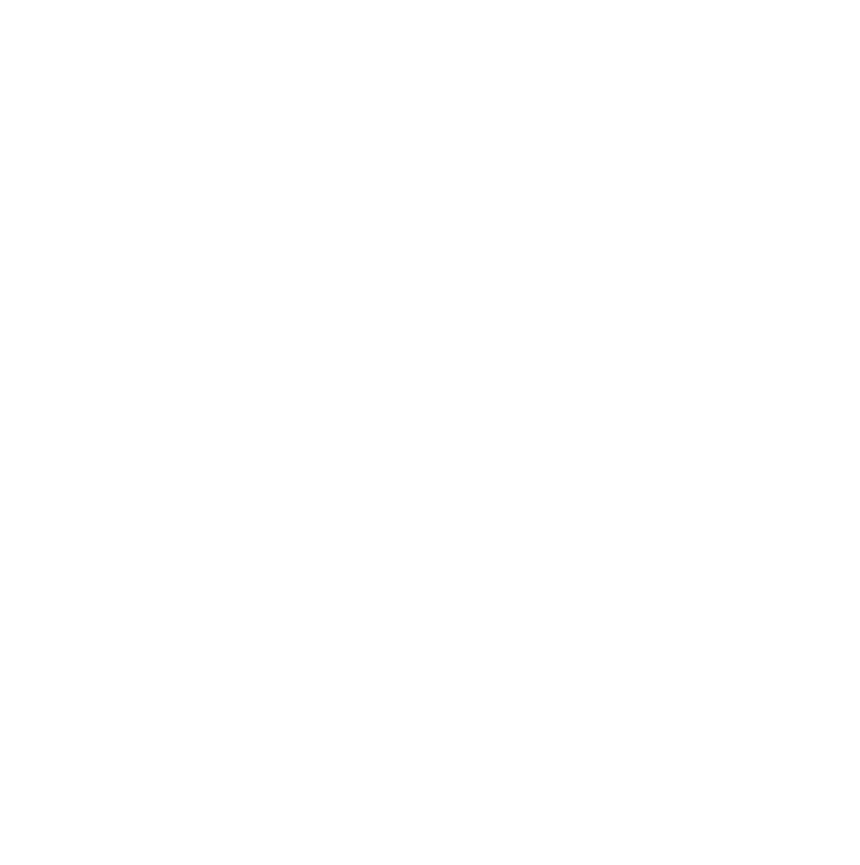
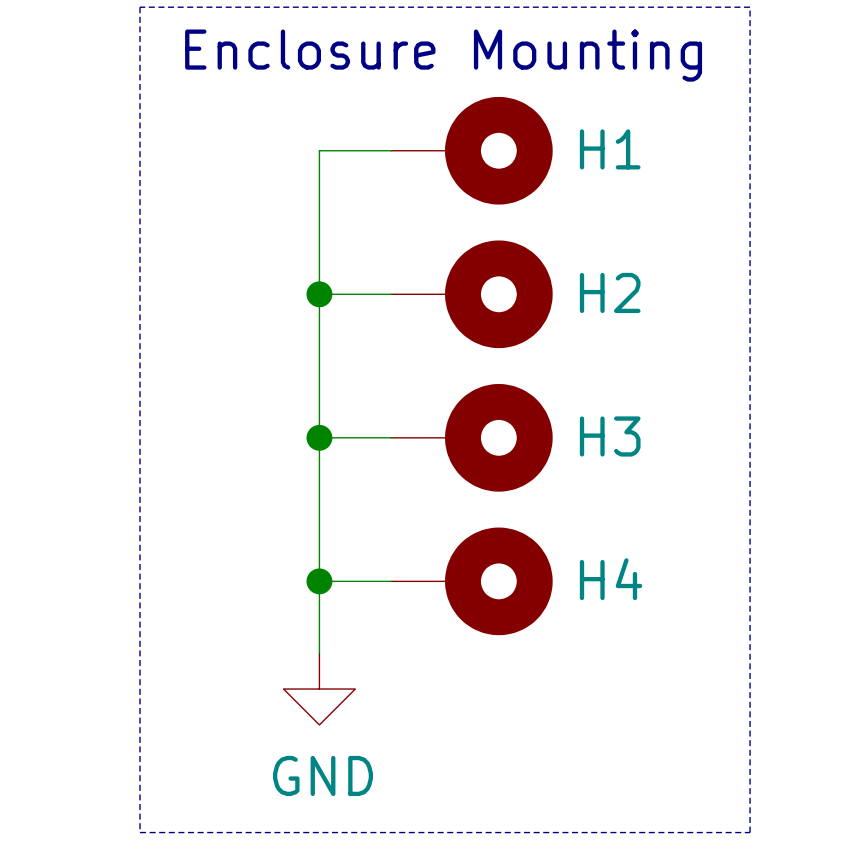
line: none -> (140, 7) (140, 832) (750, 832) (750, 7) (140, 7)
text: none -> Enclosure Mounting (443, 55)
wire: none -> (391, 150) (319, 150) (319, 653)
H1: none -> (471, 150)
wire: none -> (319, 294) (391, 294)
junction: none -> (319, 294)
H2: none -> (471, 294)
wire: none -> (319, 437) (391, 437)
junction: none -> (319, 437)
H3: none -> (471, 437)
wire: none -> (319, 581) (391, 581)
junction: none -> (319, 581)
H4: none -> (471, 581)
power symbol: none -> GND (319, 689)

